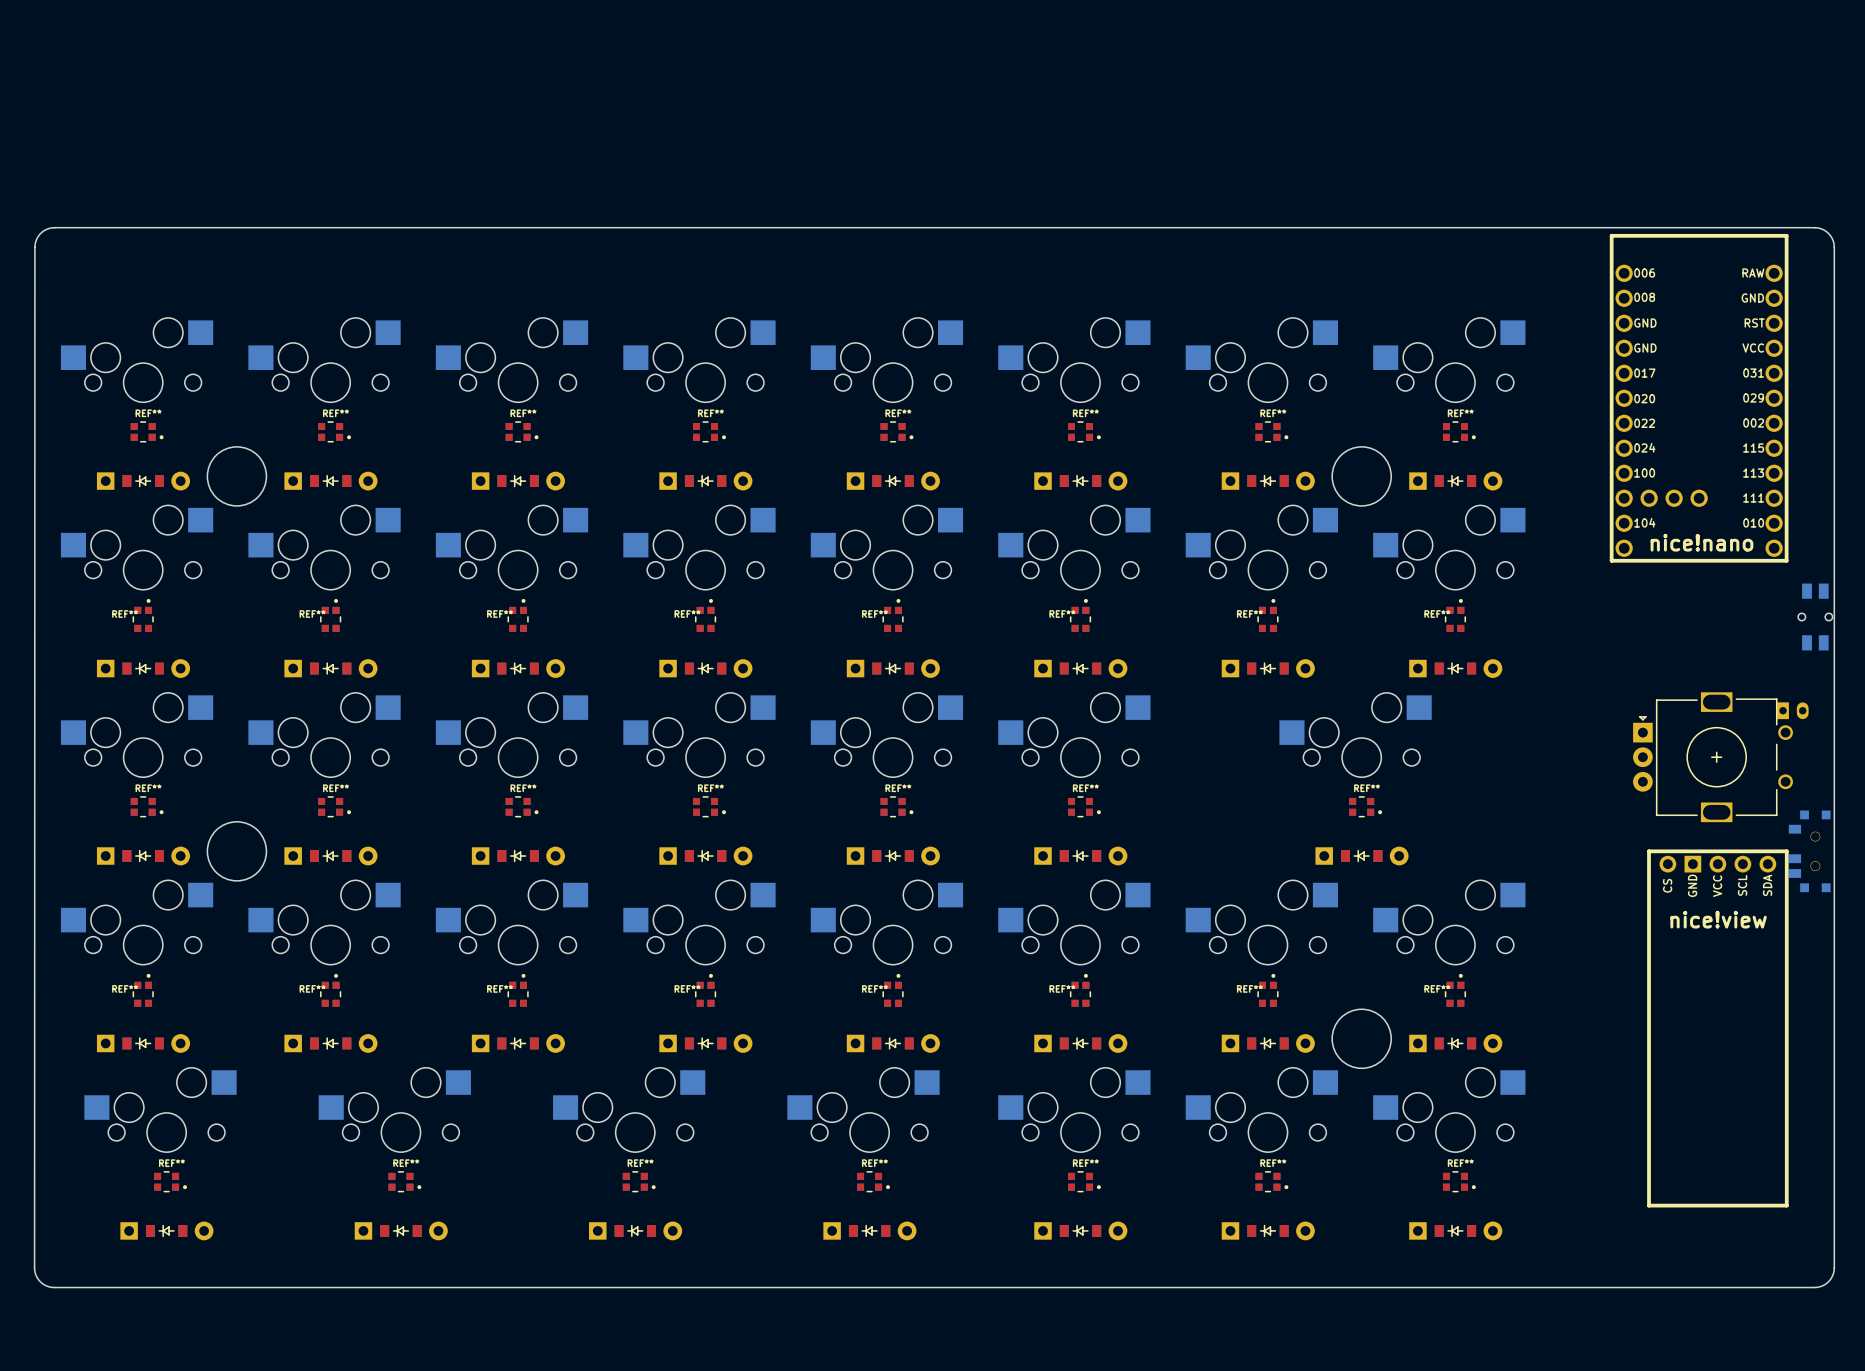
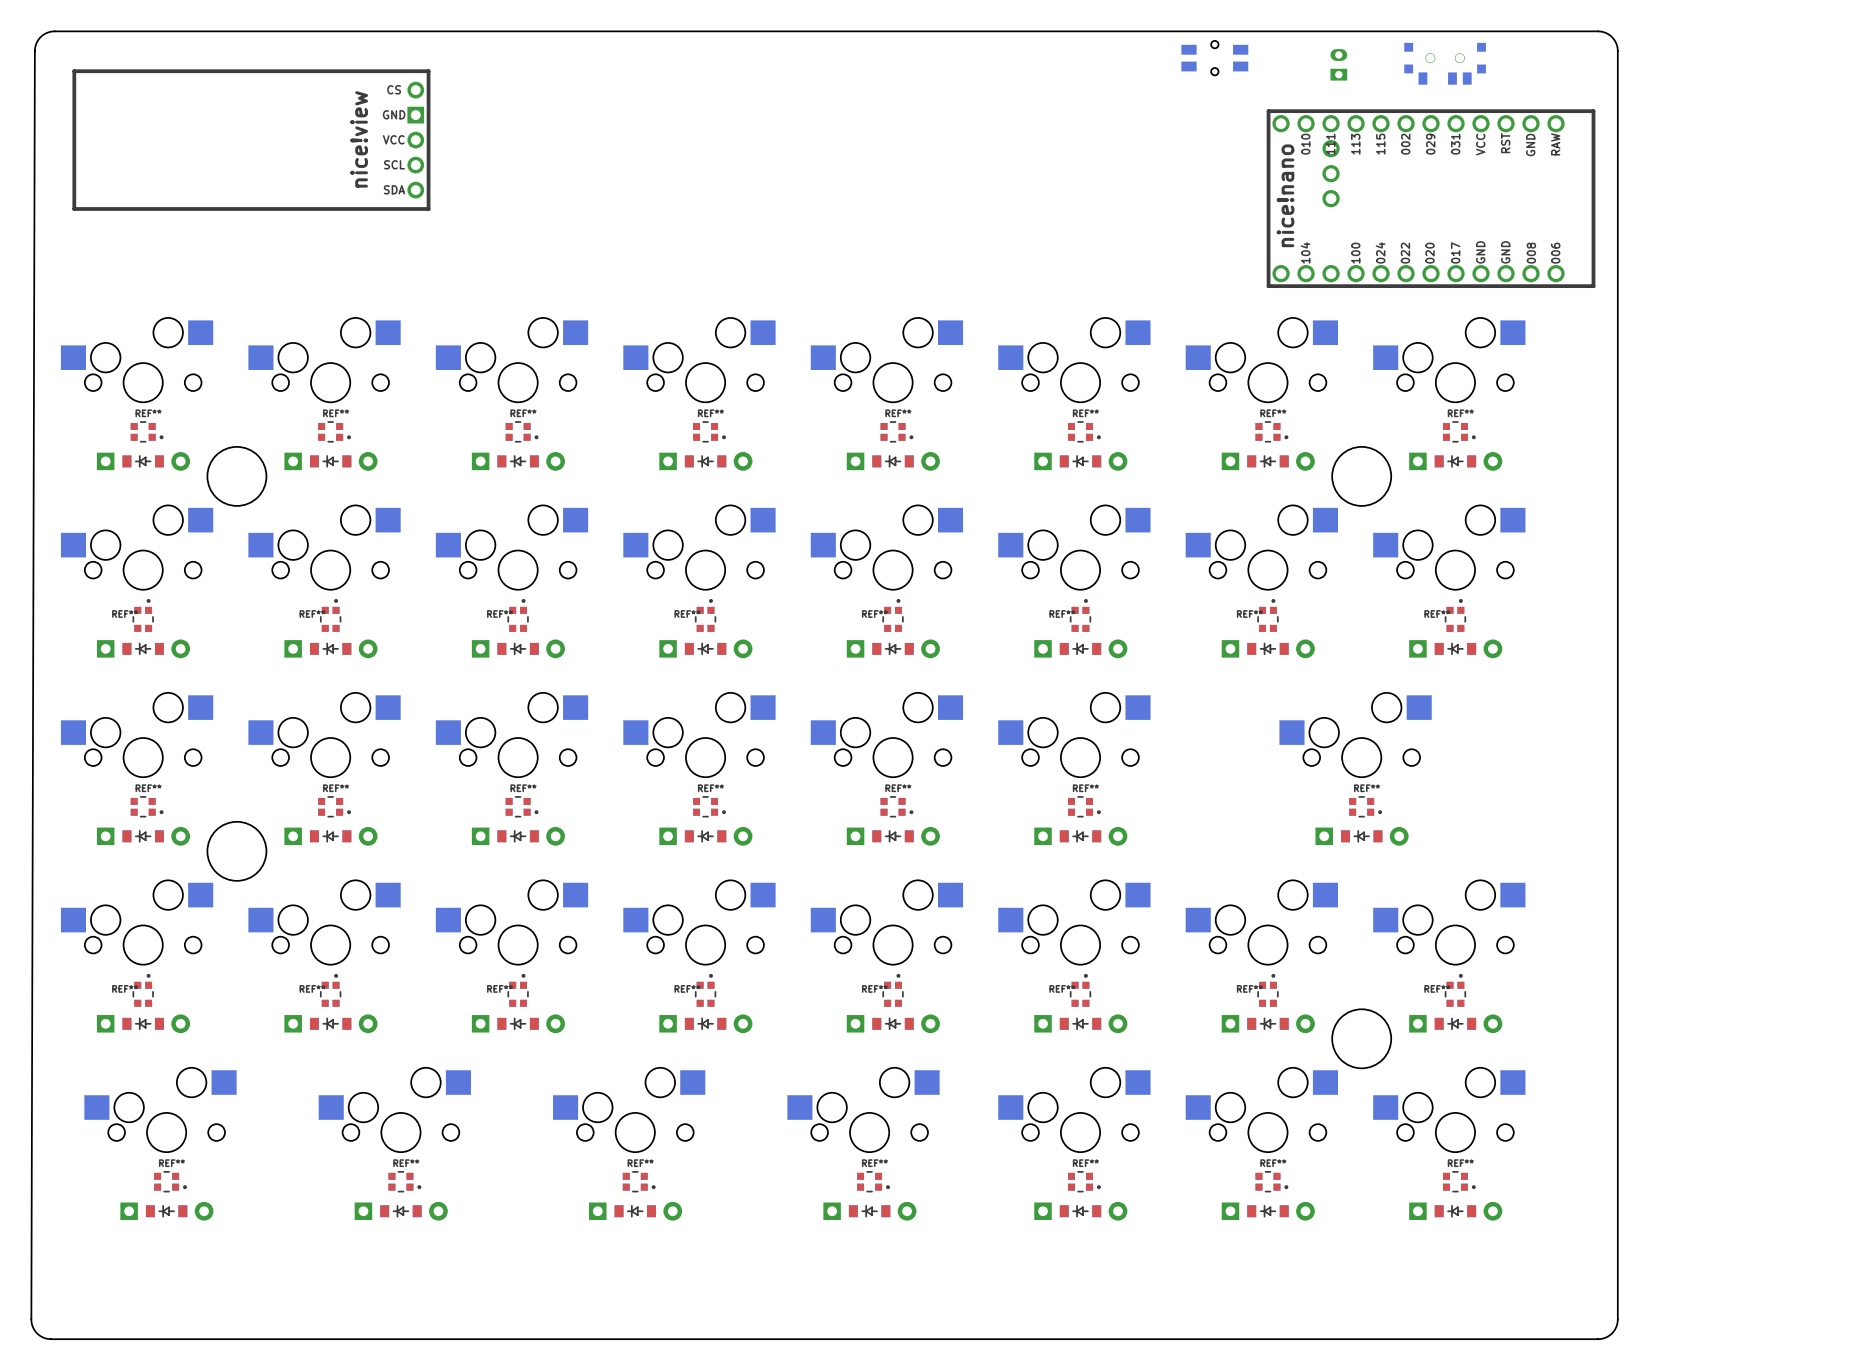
part: none -> (1214, 58)
part: none -> (1445, 63)
part: none -> (1338, 64)
part: none -> (251, 140)
part: none -> (1431, 198)
board edge: (54, 227) (1814, 227) (1824, 230) (1831, 237) (1834, 247) (1834, 1267) (1831, 1277) (1824, 1284) (1814, 1287) (54, 1287) (43, 1284) (36, 1276) (34, 1267) (34, 247) (40, 233) (54, 227) -> (54, 31) (40, 37) (34, 50) (31, 1319) (33, 1328) (38, 1334) (51, 1339) (1598, 1339) (1605, 1337) (1613, 1331) (1617, 1319) (1617, 51) (1616, 43) (1610, 35) (1598, 31) (54, 31)
part: (1699, 398) -> none
part position: (143, 481) -> (143, 461)
part position: (330, 481) -> (330, 461)
part position: (518, 481) -> (518, 461)
part position: (705, 481) -> (705, 461)
part position: (893, 481) -> (893, 461)
part position: (1080, 481) -> (1080, 461)
part position: (1268, 481) -> (1268, 461)
part position: (1455, 481) -> (1455, 461)
part: (1815, 617) -> none
part position: (143, 668) -> (143, 648)
part position: (330, 668) -> (330, 648)
part position: (518, 668) -> (518, 648)
part position: (705, 668) -> (705, 648)
part position: (893, 668) -> (893, 648)
part position: (1080, 668) -> (1080, 648)
part position: (1268, 668) -> (1268, 648)
part position: (1455, 668) -> (1455, 648)
part: (1792, 710) -> none
part: (1713, 757) -> none
part: (1809, 851) -> none
part position: (143, 856) -> (143, 836)
part position: (330, 856) -> (330, 836)
part position: (518, 856) -> (518, 836)
part position: (705, 856) -> (705, 836)
part position: (893, 856) -> (893, 836)
part position: (1080, 856) -> (1080, 836)
part position: (1362, 856) -> (1362, 836)
part: (1717, 1028) -> none
part position: (143, 1043) -> (143, 1023)
part position: (330, 1043) -> (330, 1023)
part position: (518, 1043) -> (518, 1023)
part position: (705, 1043) -> (705, 1023)
part position: (893, 1043) -> (893, 1023)
part position: (1080, 1043) -> (1080, 1023)
part position: (1268, 1043) -> (1268, 1023)
part position: (1455, 1043) -> (1455, 1023)
part position: (166, 1230) -> (166, 1211)
part position: (401, 1230) -> (401, 1211)
part position: (635, 1230) -> (635, 1211)
part position: (869, 1230) -> (869, 1211)
part position: (1080, 1230) -> (1080, 1211)
part position: (1268, 1230) -> (1268, 1211)
part position: (1455, 1230) -> (1455, 1211)

